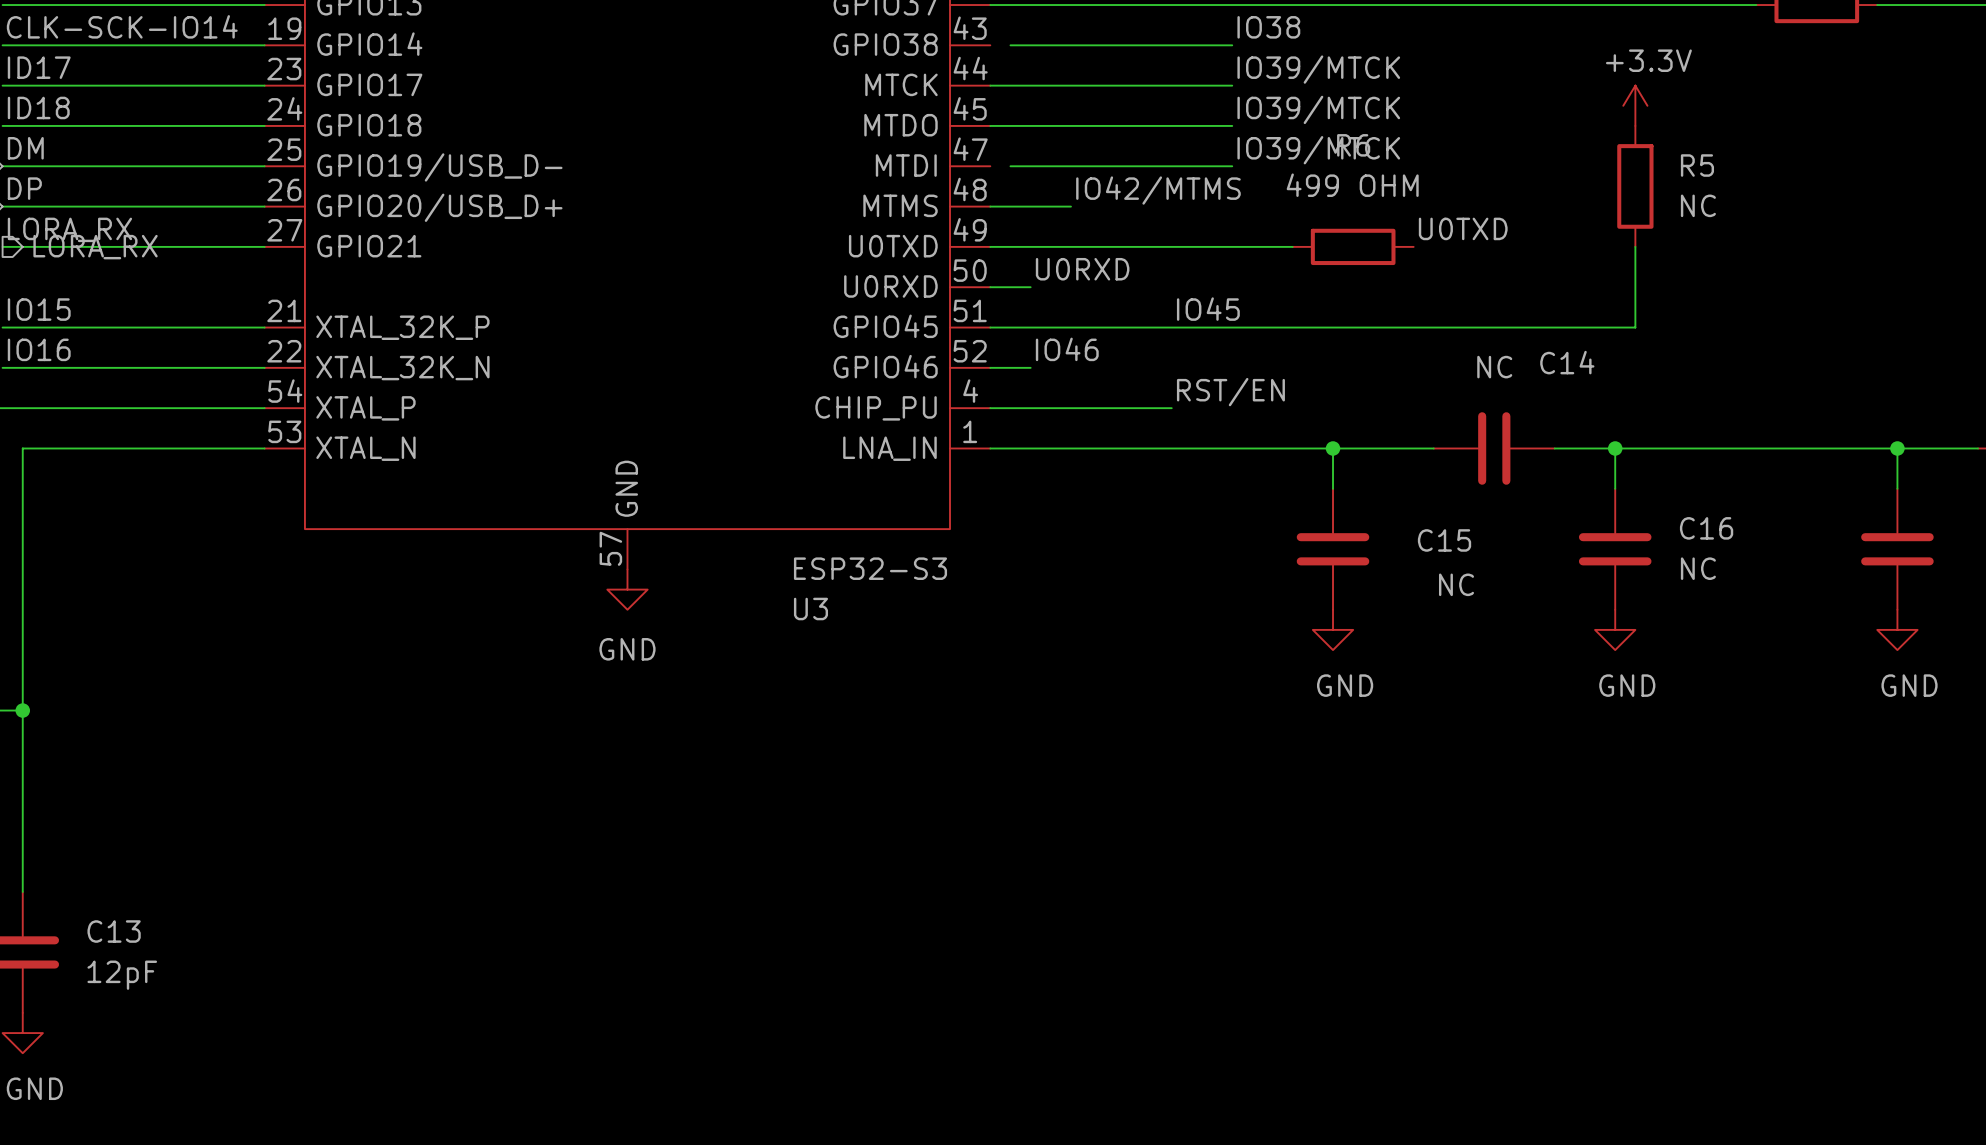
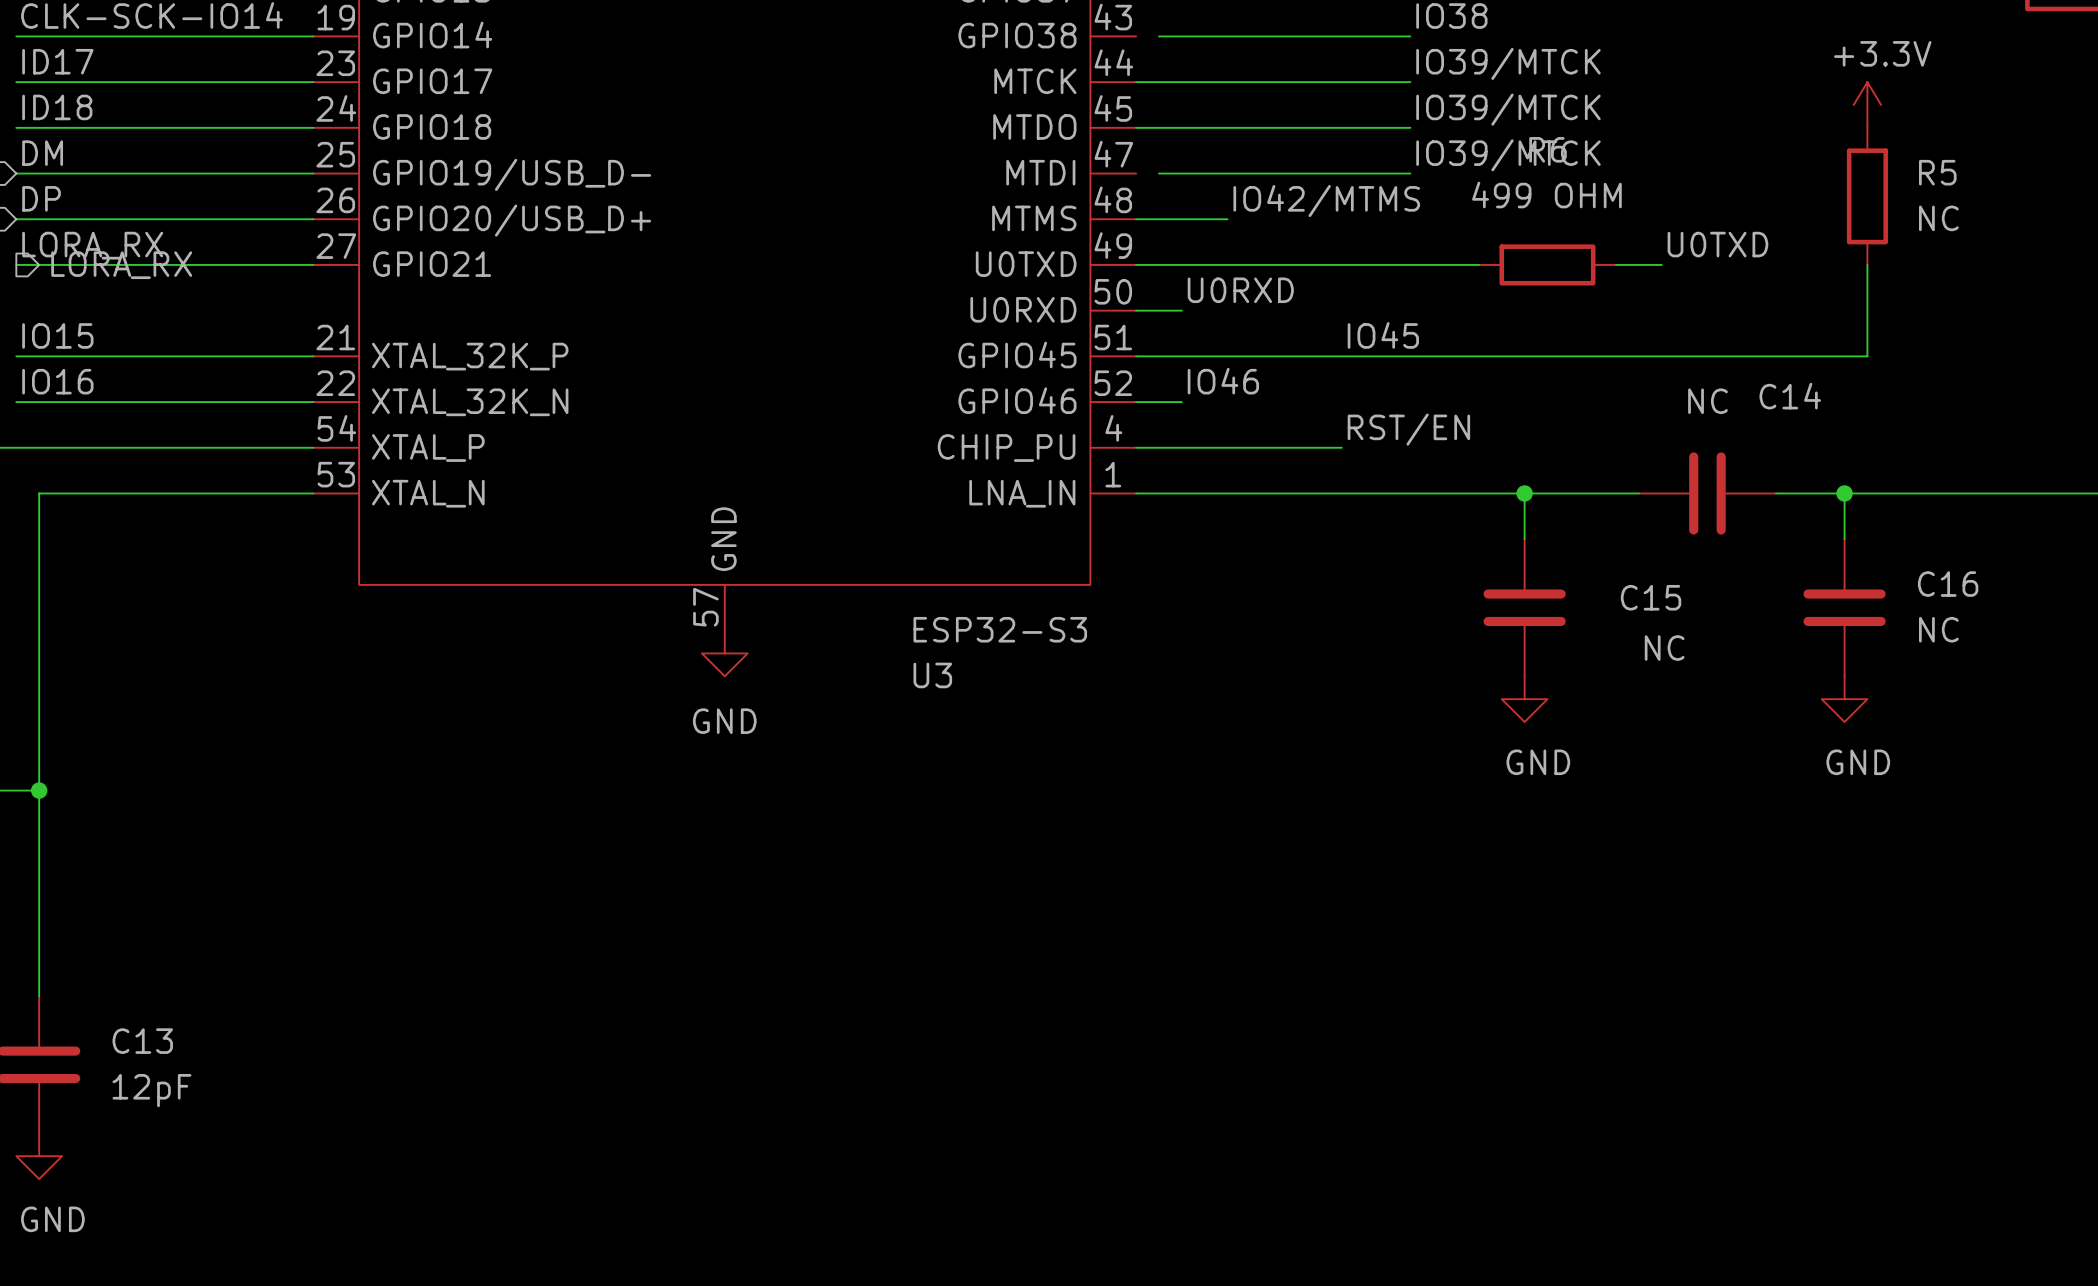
label position: U0TXD (1463, 228) -> U0TXD (1717, 244)
wire: none -> (1616, 264) (1661, 264)

